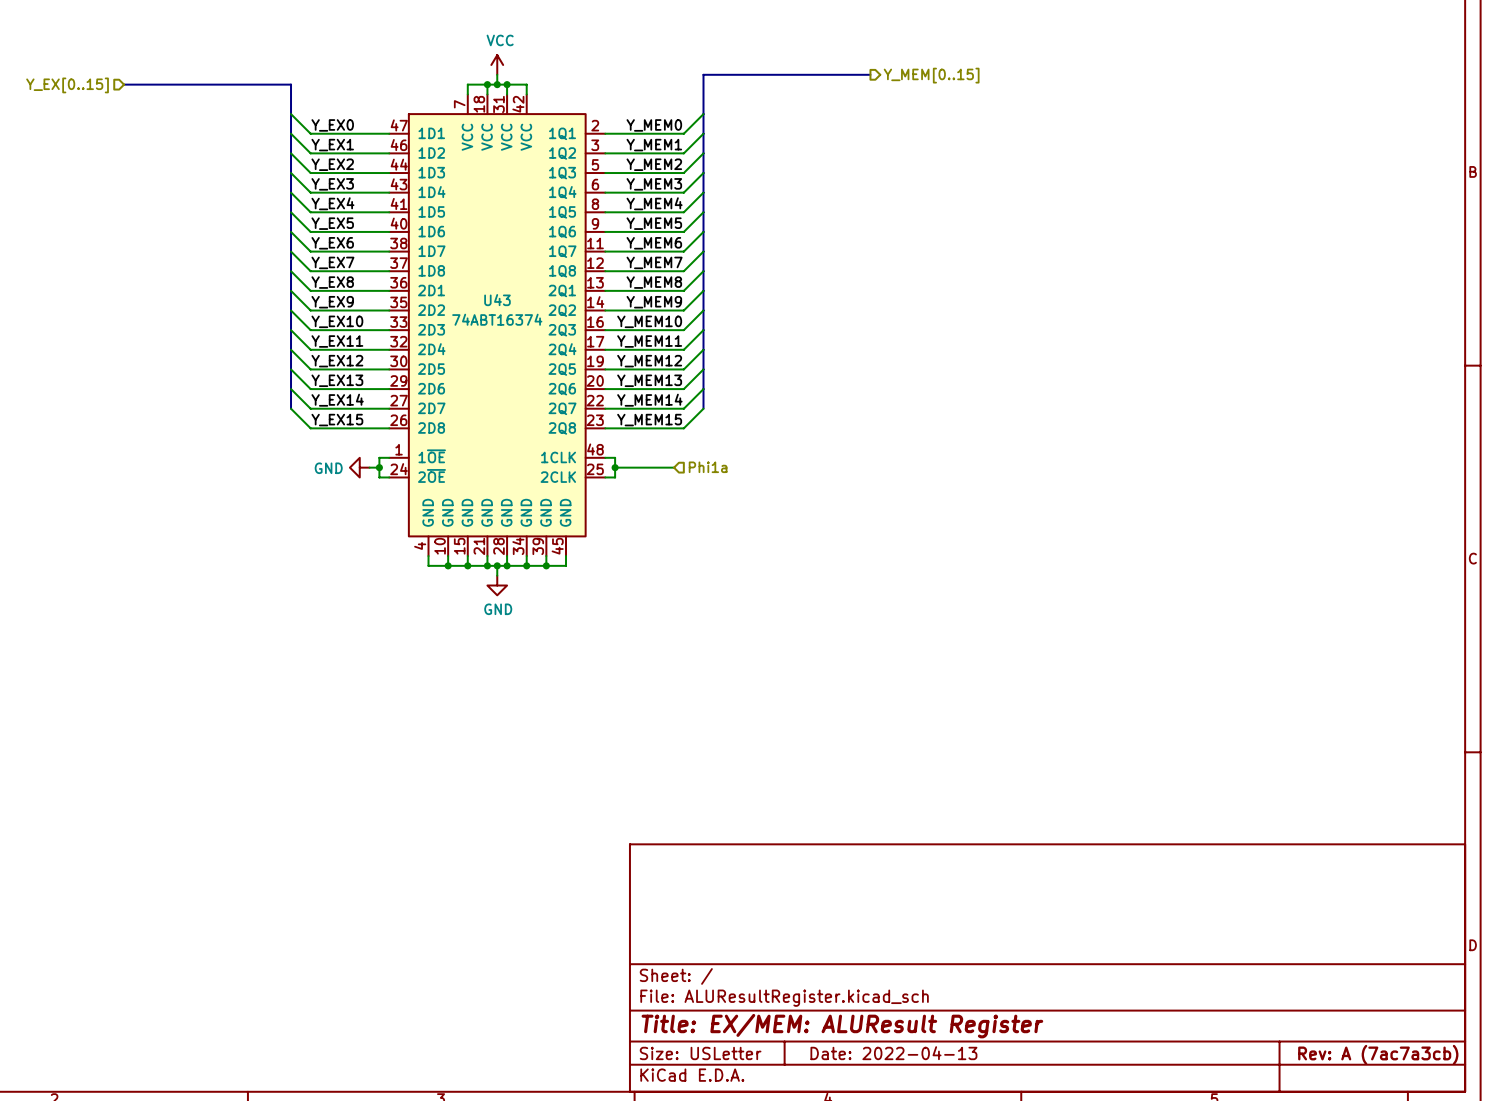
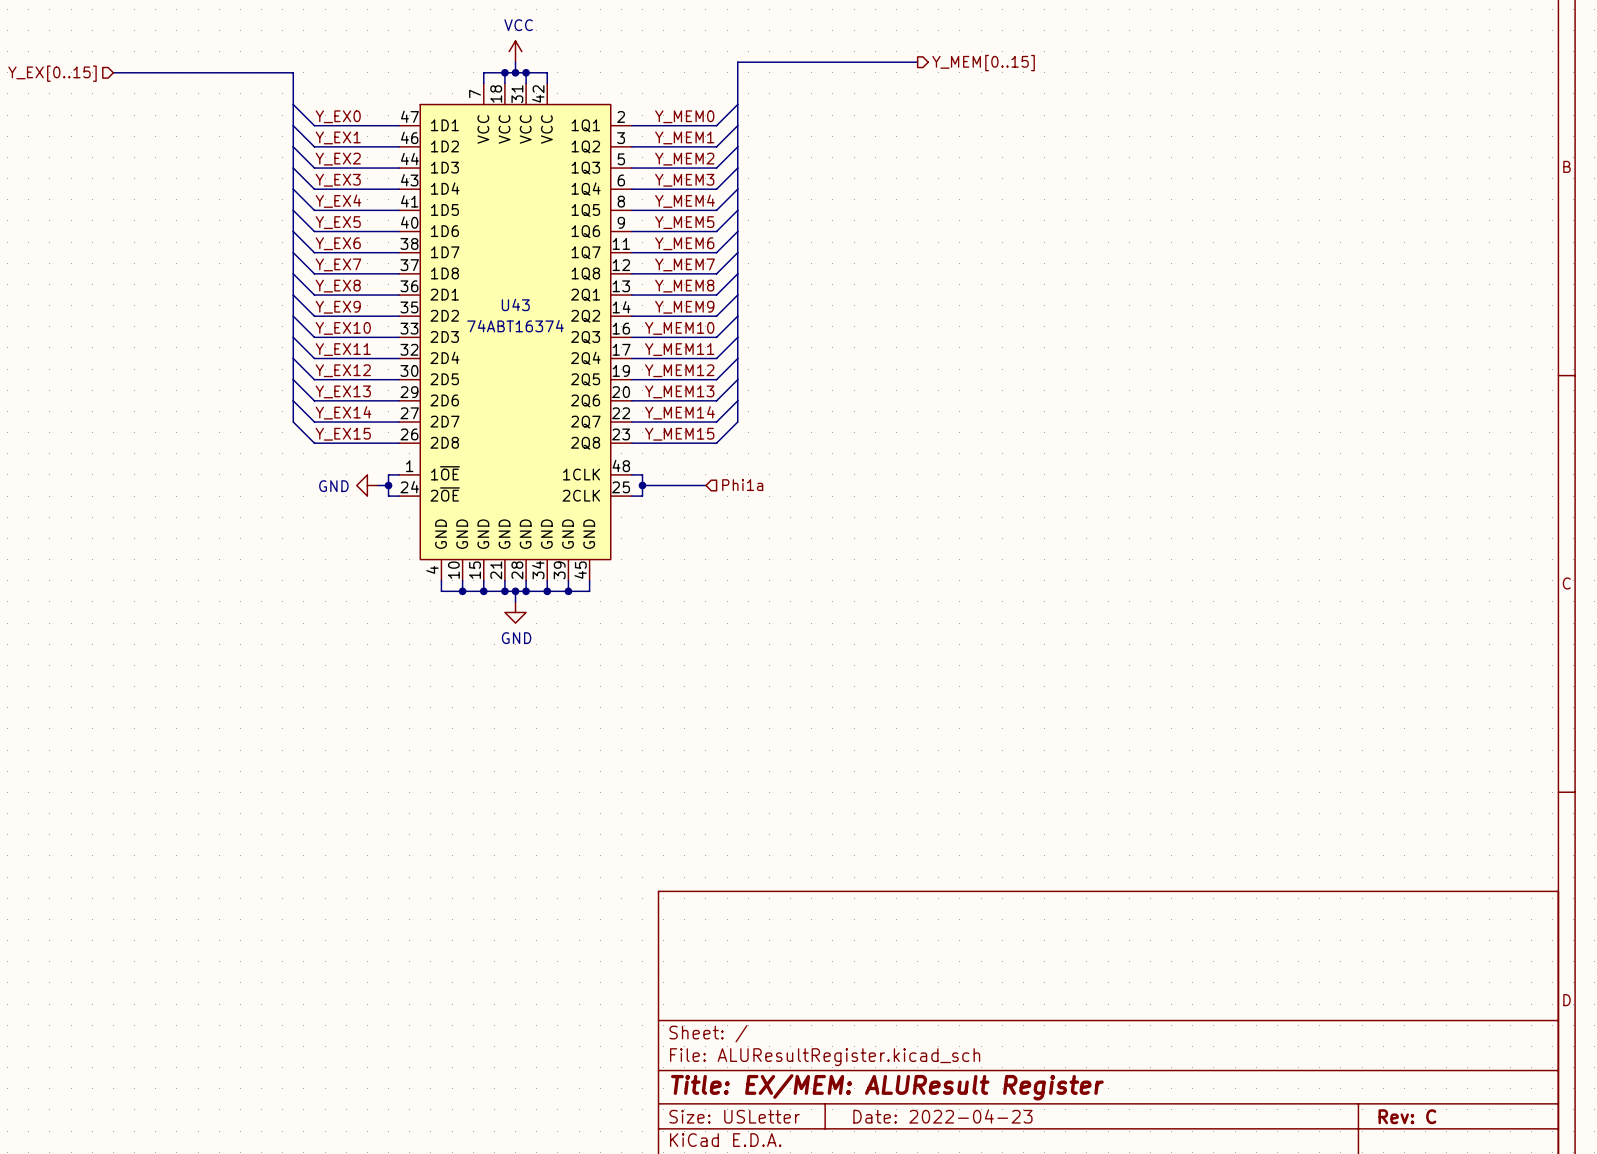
title block: Date: 2022-04-13 (893, 1053) -> Date: 2022-04-23 (942, 1116)
title block: Rev: A (7ac7a3cb) (1378, 1054) -> Rev: C (1407, 1116)

